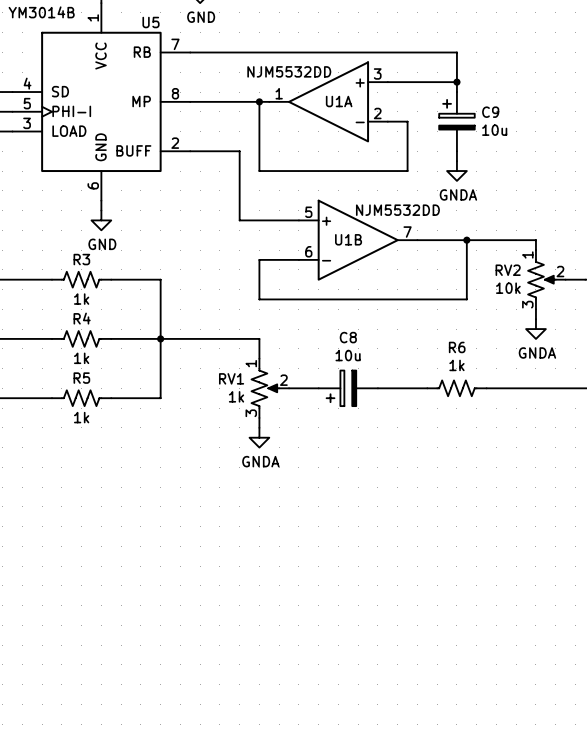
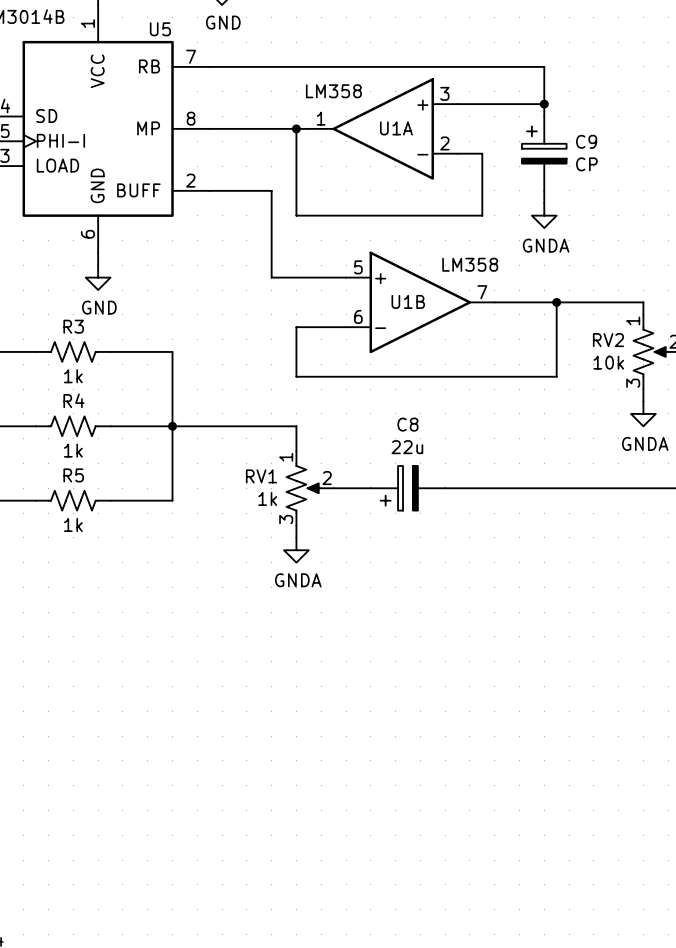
U1A value: NJM5532DD (289, 71) -> LM358 (333, 91)
C9 value: 10u (494, 130) -> CP (586, 164)
U1B value: NJM5532DD (397, 210) -> LM358 (470, 264)
C8 value: 10u (348, 355) -> 22u (407, 447)
R6: 1k (456, 388) -> none

